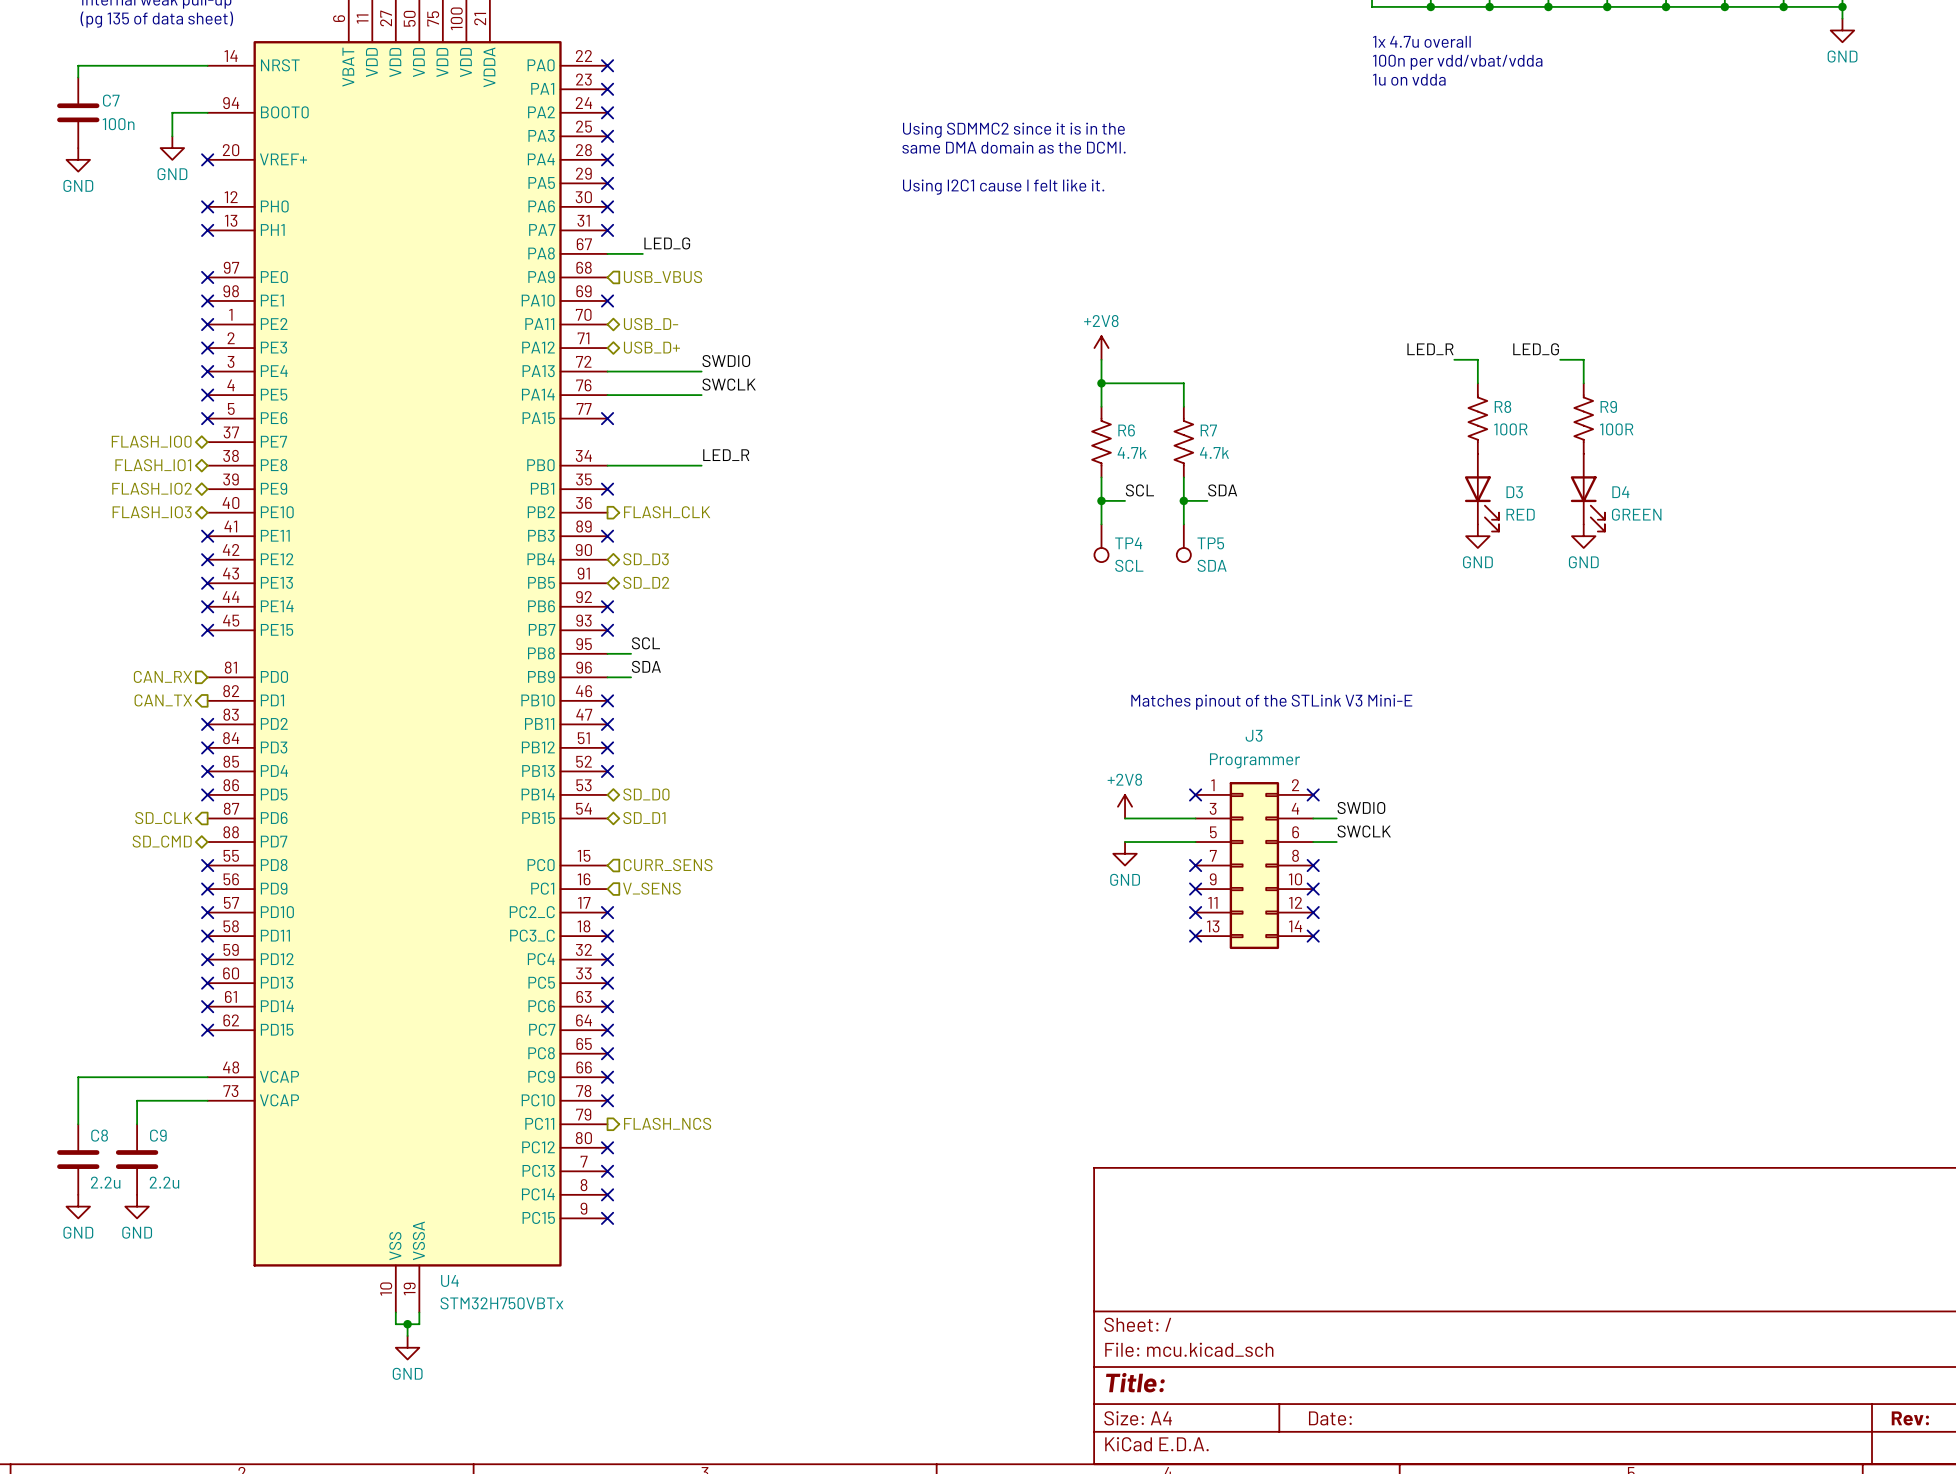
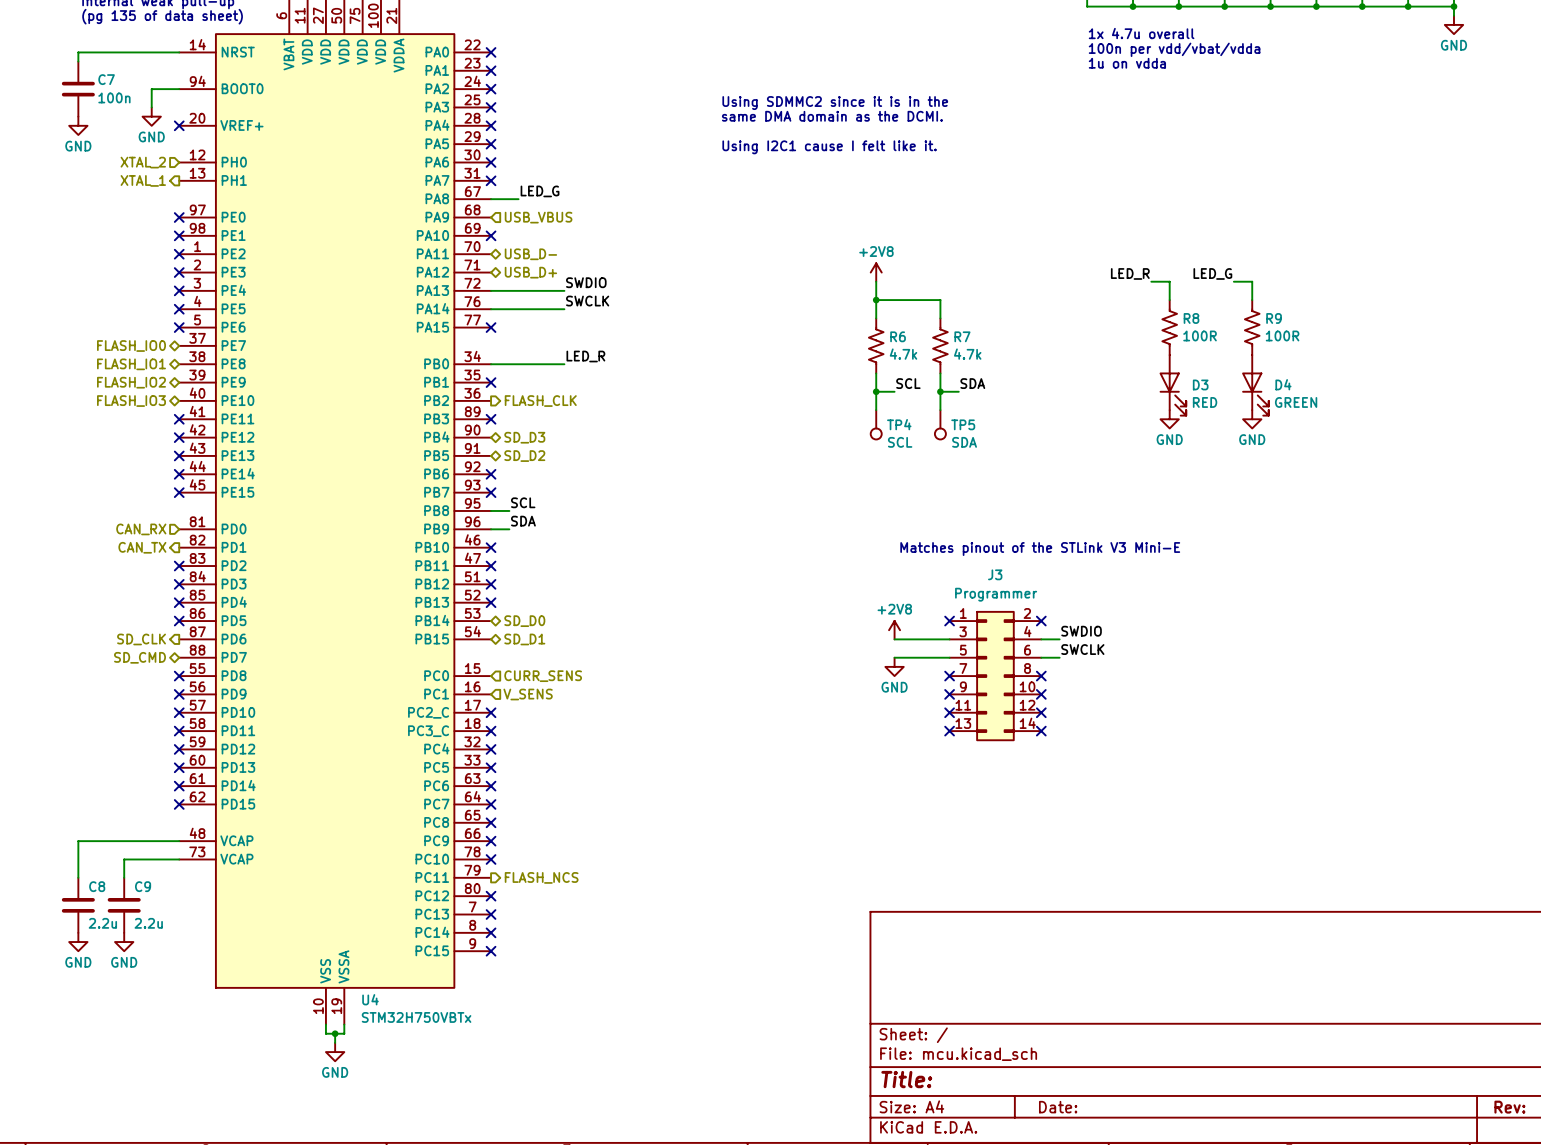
hierarchical label: none -> XTAL_2 (143, 162)
no-connect mark: (207, 206) -> none
hierarchical label: none -> XTAL_1 (143, 180)
no-connect mark: (207, 230) -> none

